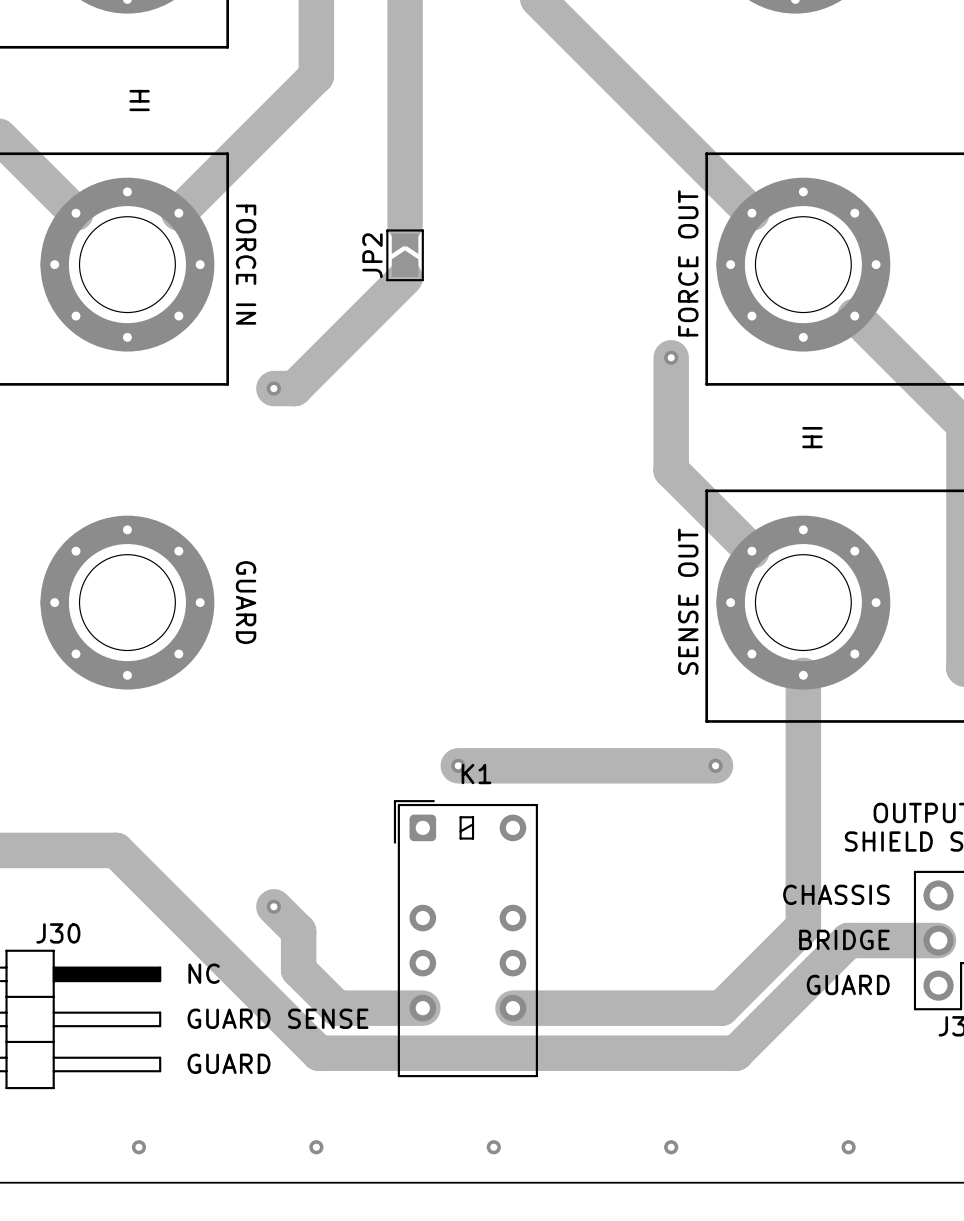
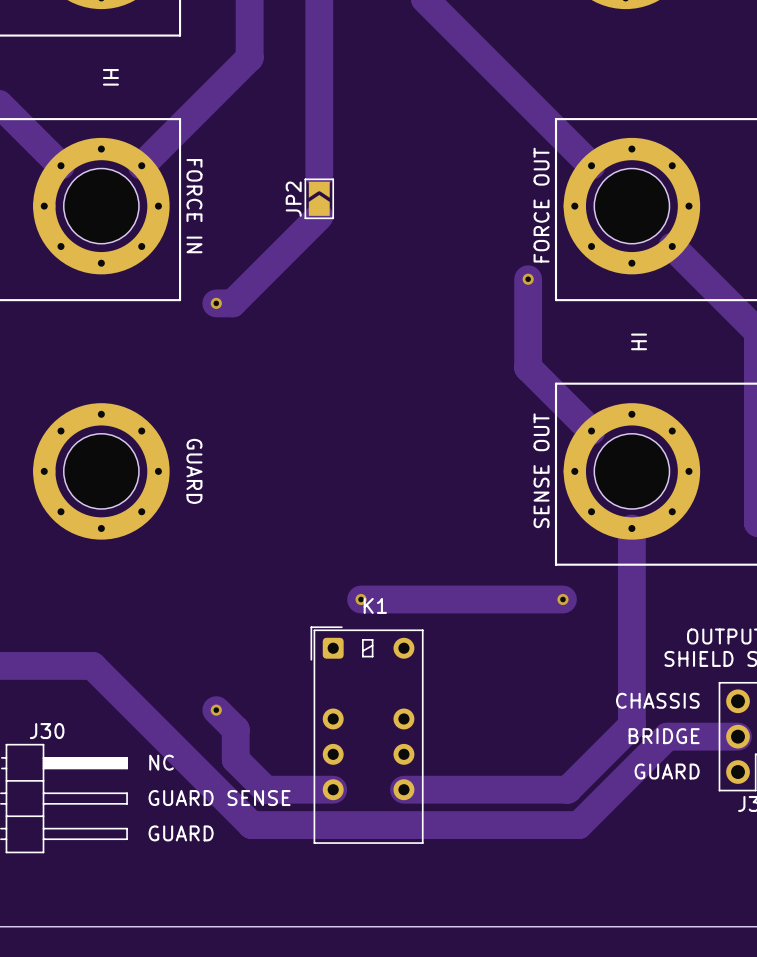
via: (138, 1147) -> none
via: (316, 1147) -> none
via: (493, 1147) -> none
via: (671, 1147) -> none
via: (848, 1147) -> none

